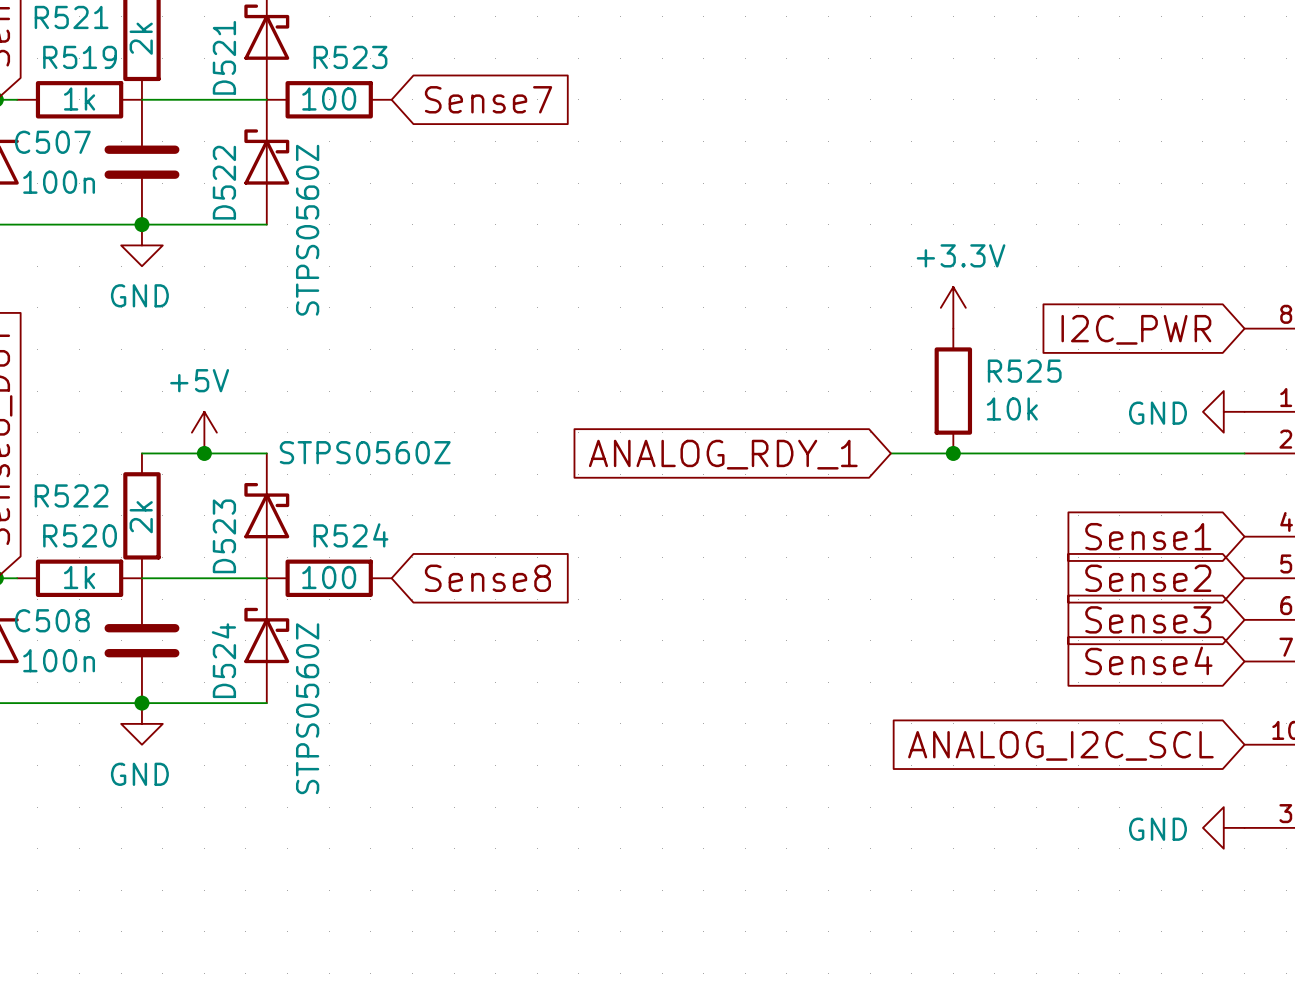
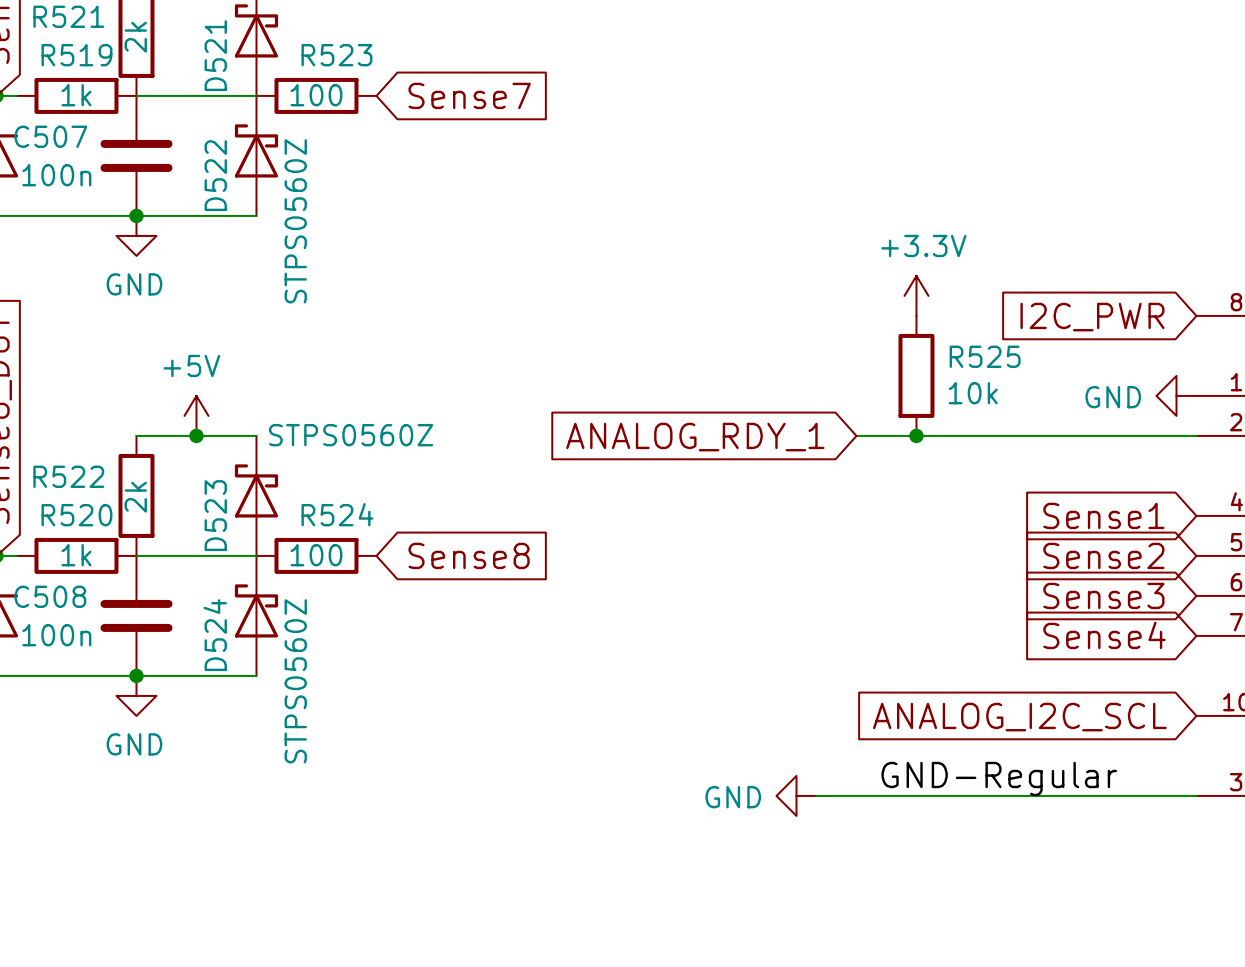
label: none -> GND-Regular (999, 778)
wire: none -> (816, 795) (1196, 795)
power symbol position: GND (1223, 827) -> GND (796, 795)

